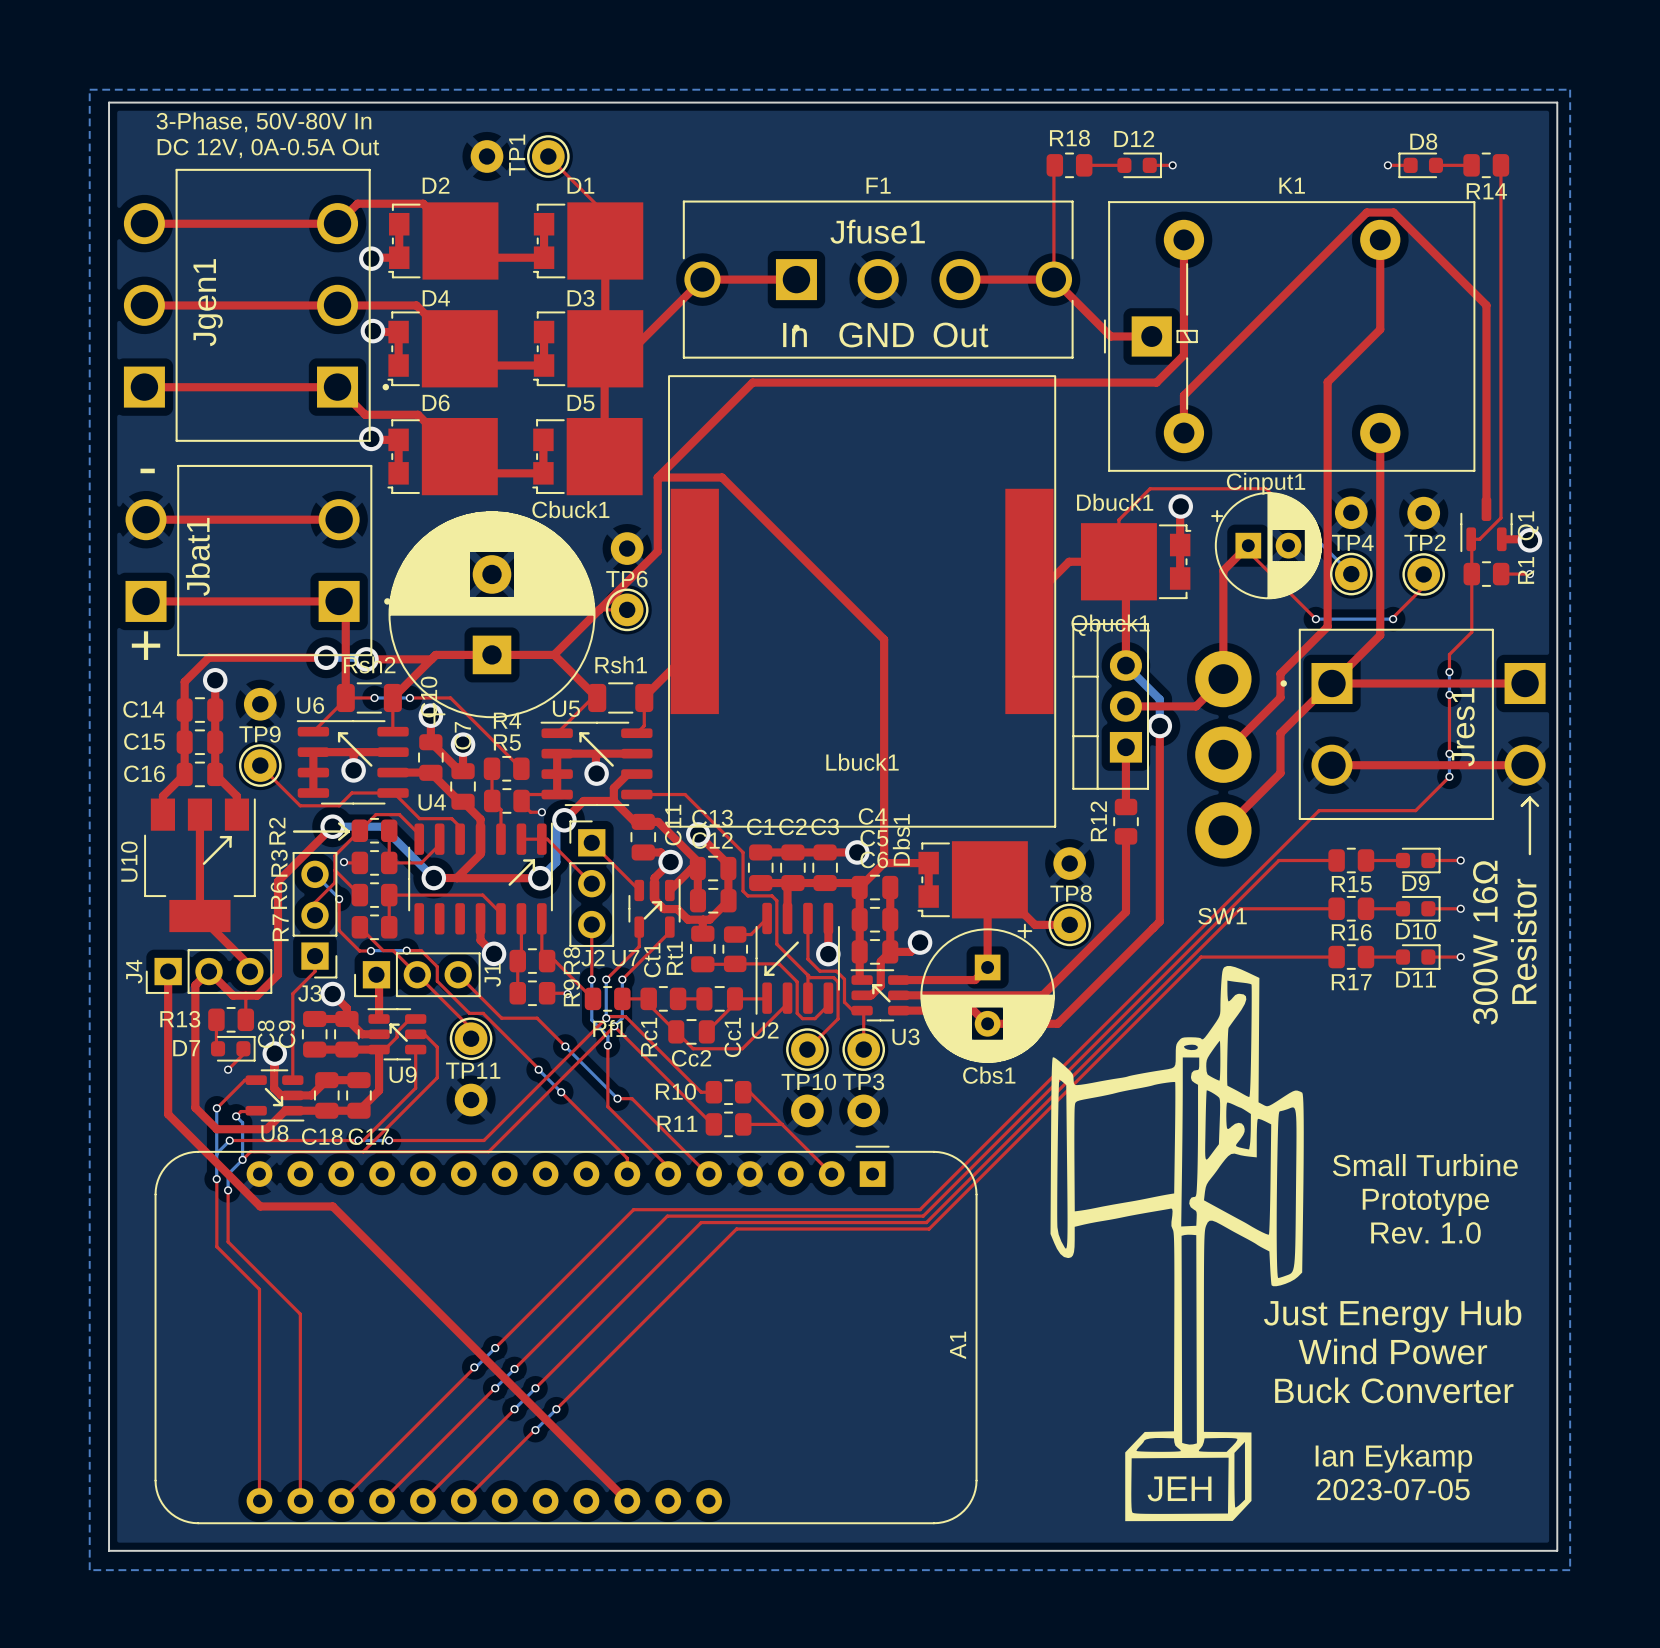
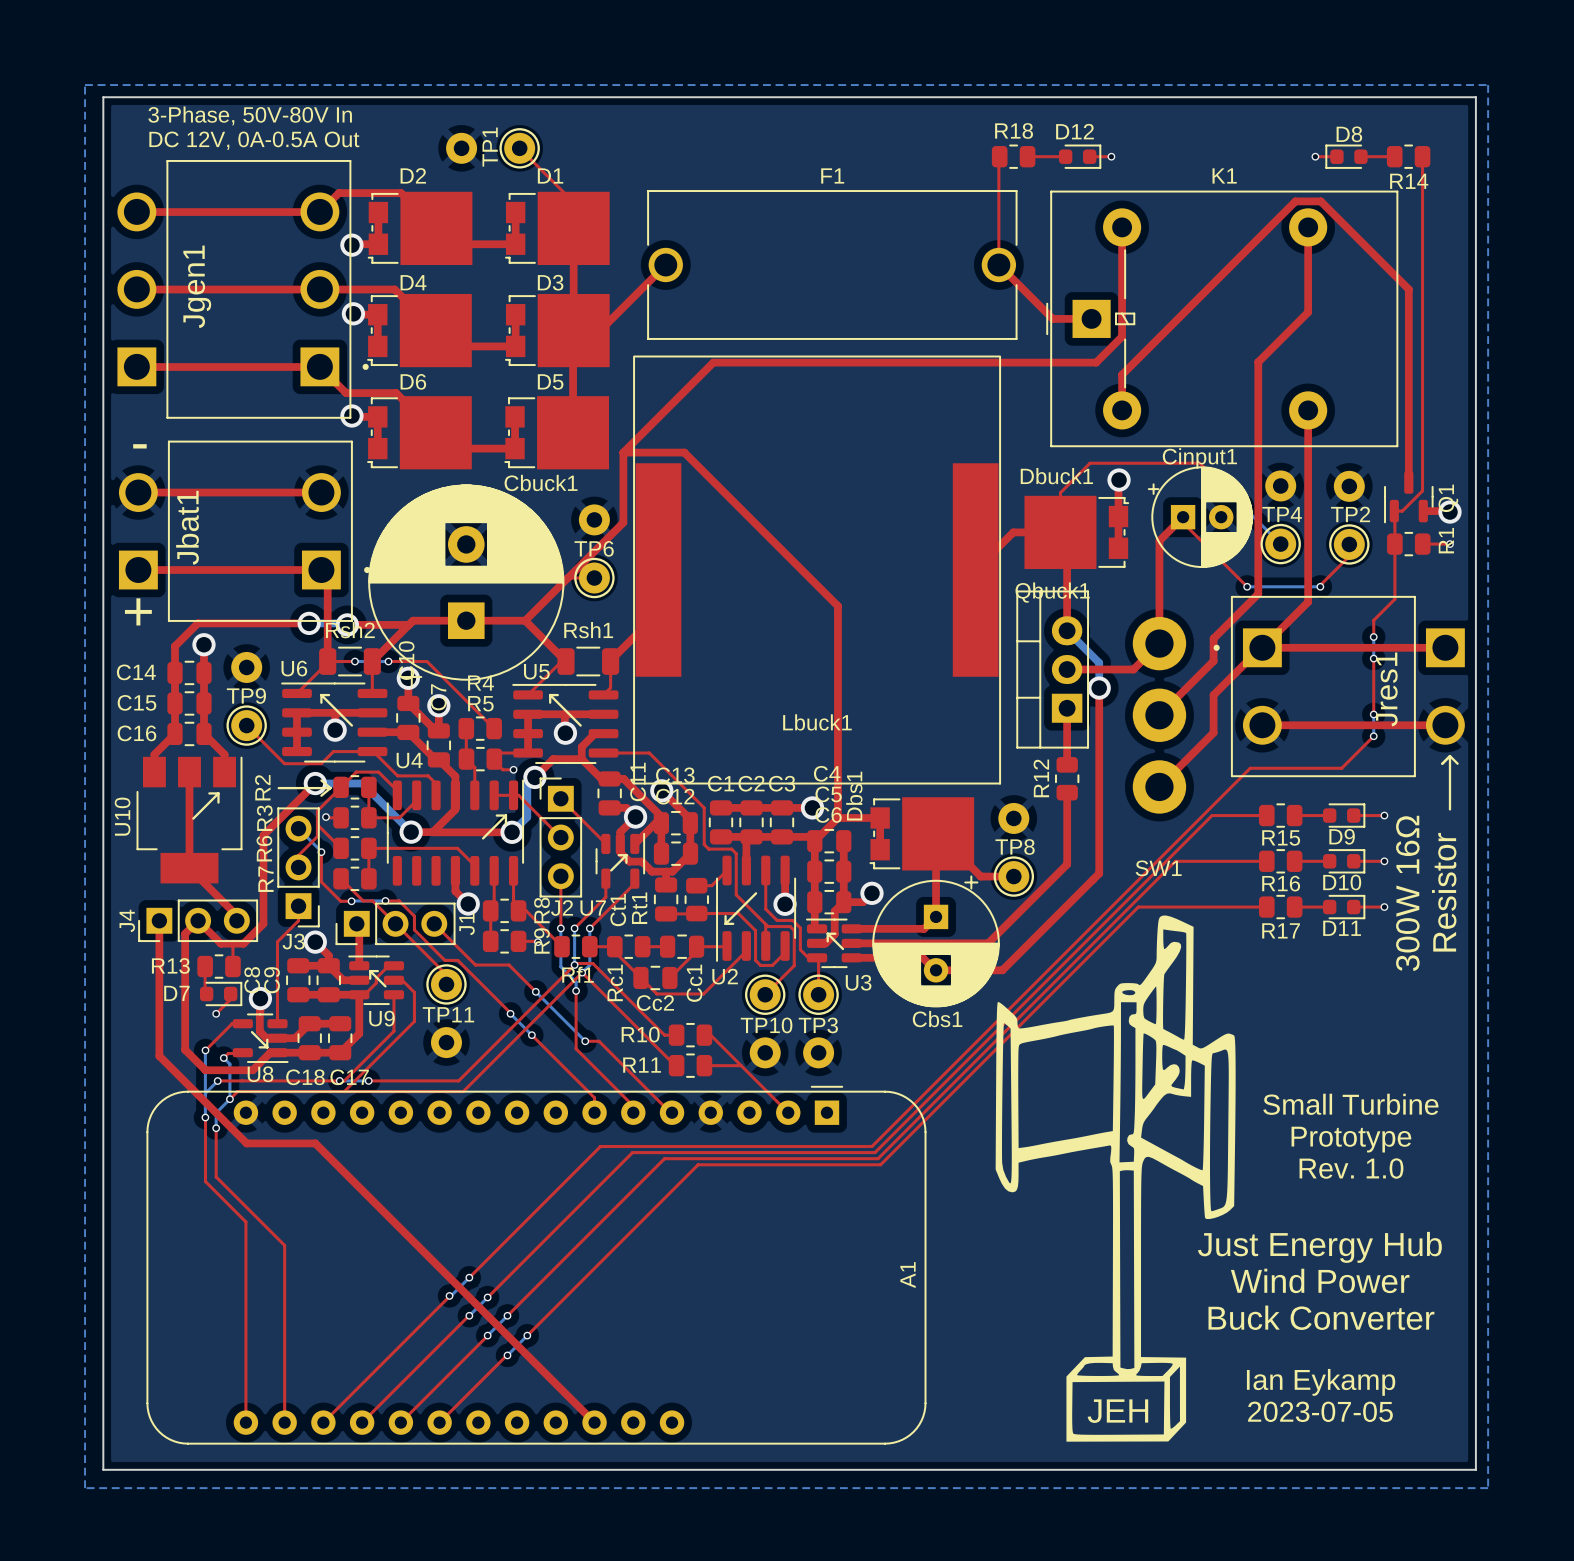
top track: (702, 279) (796, 279) -> none
top track: (959, 279) (1053, 279) -> none
Jfuse1: (878, 295) -> none
text: In (795, 335) -> none
text: GND (876, 335) -> none
text: Out (960, 335) -> none

